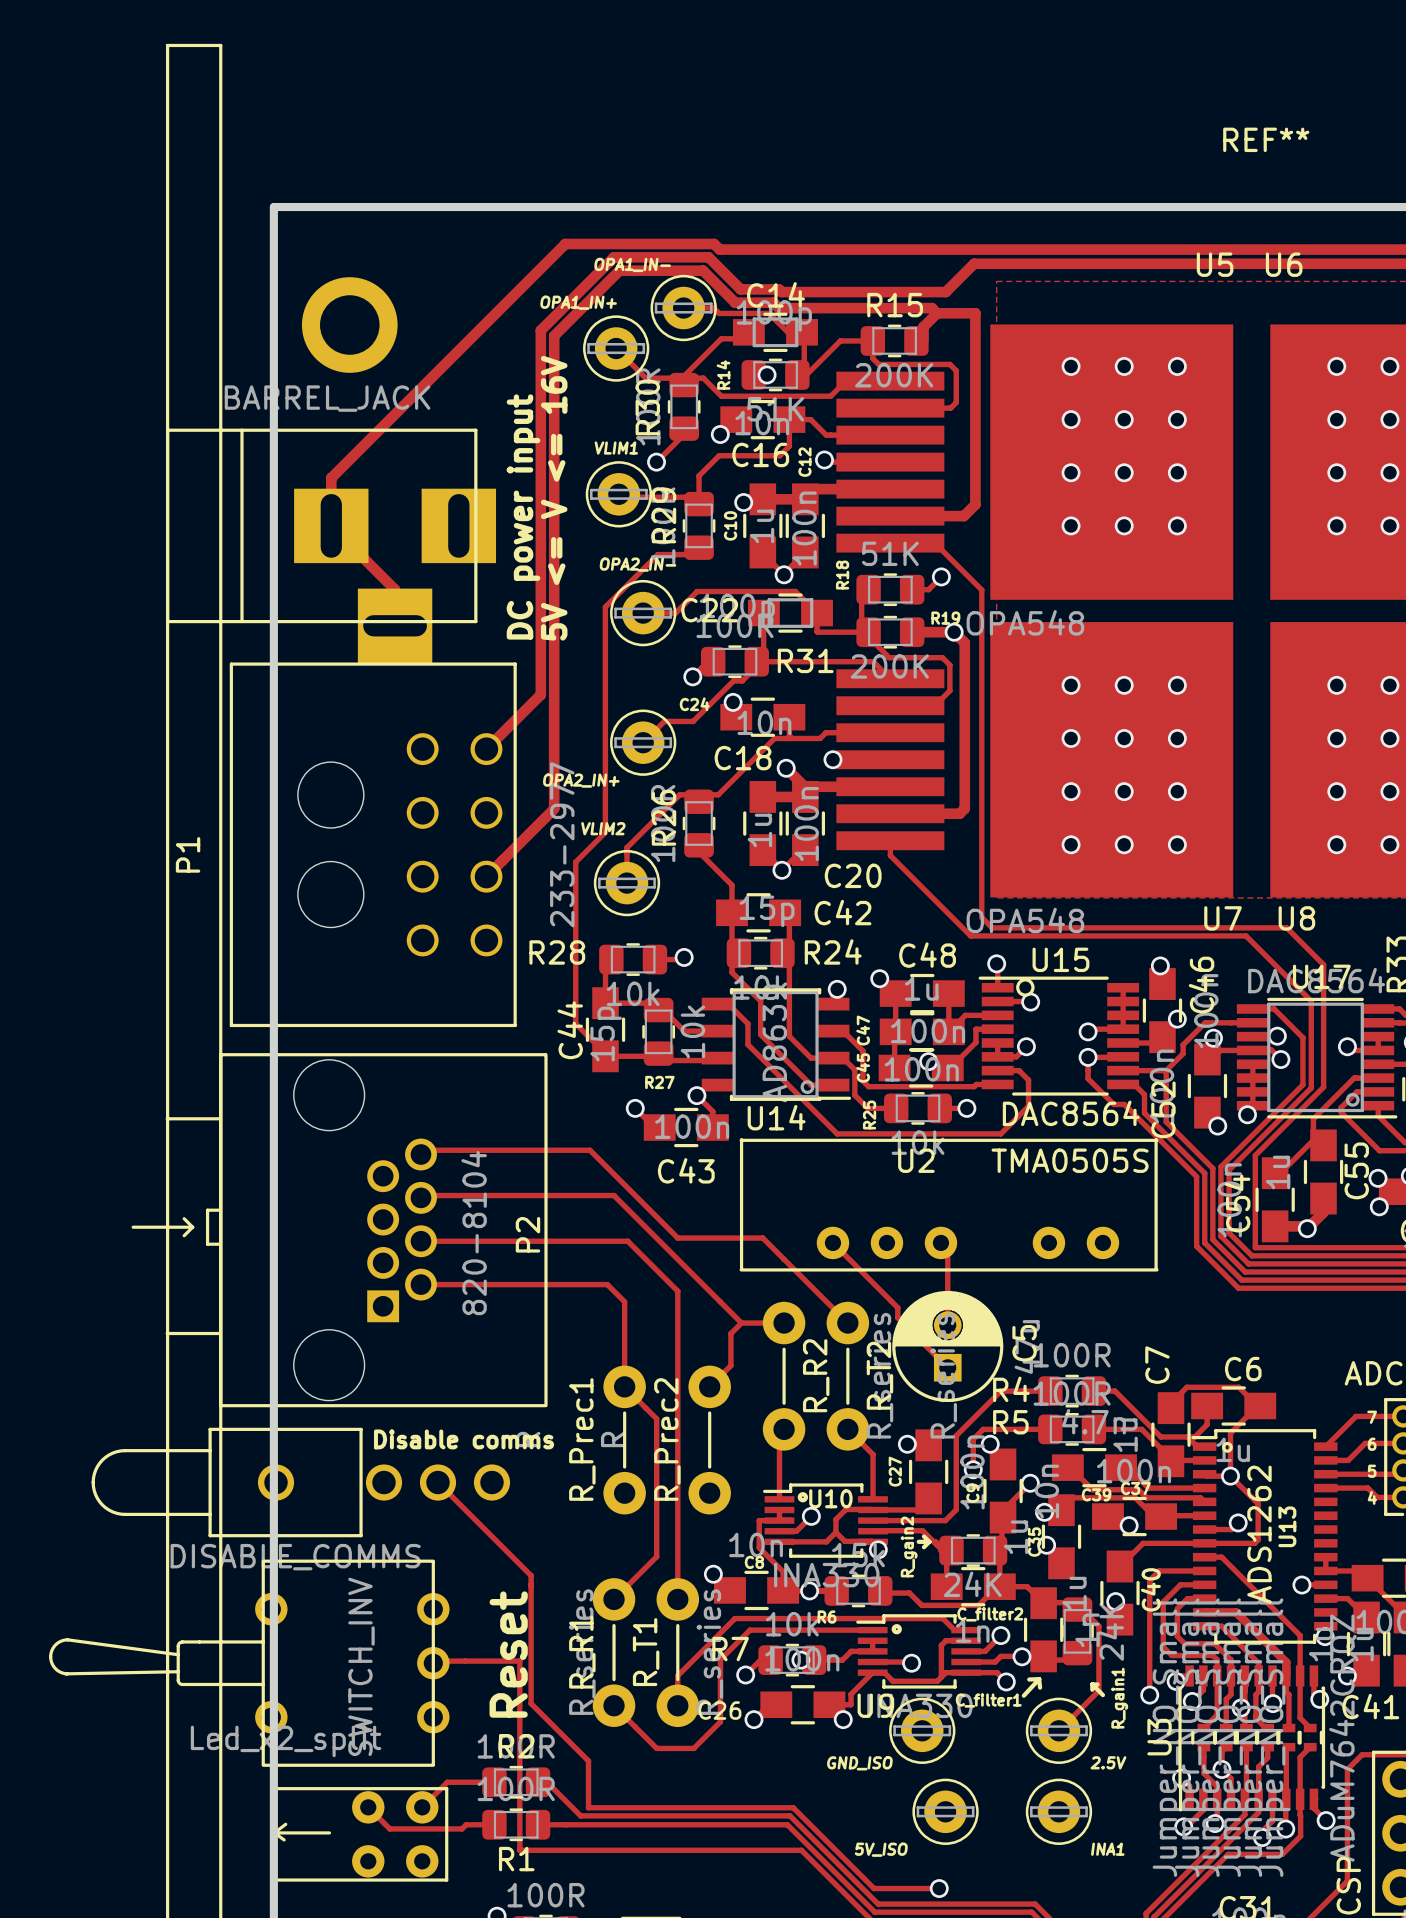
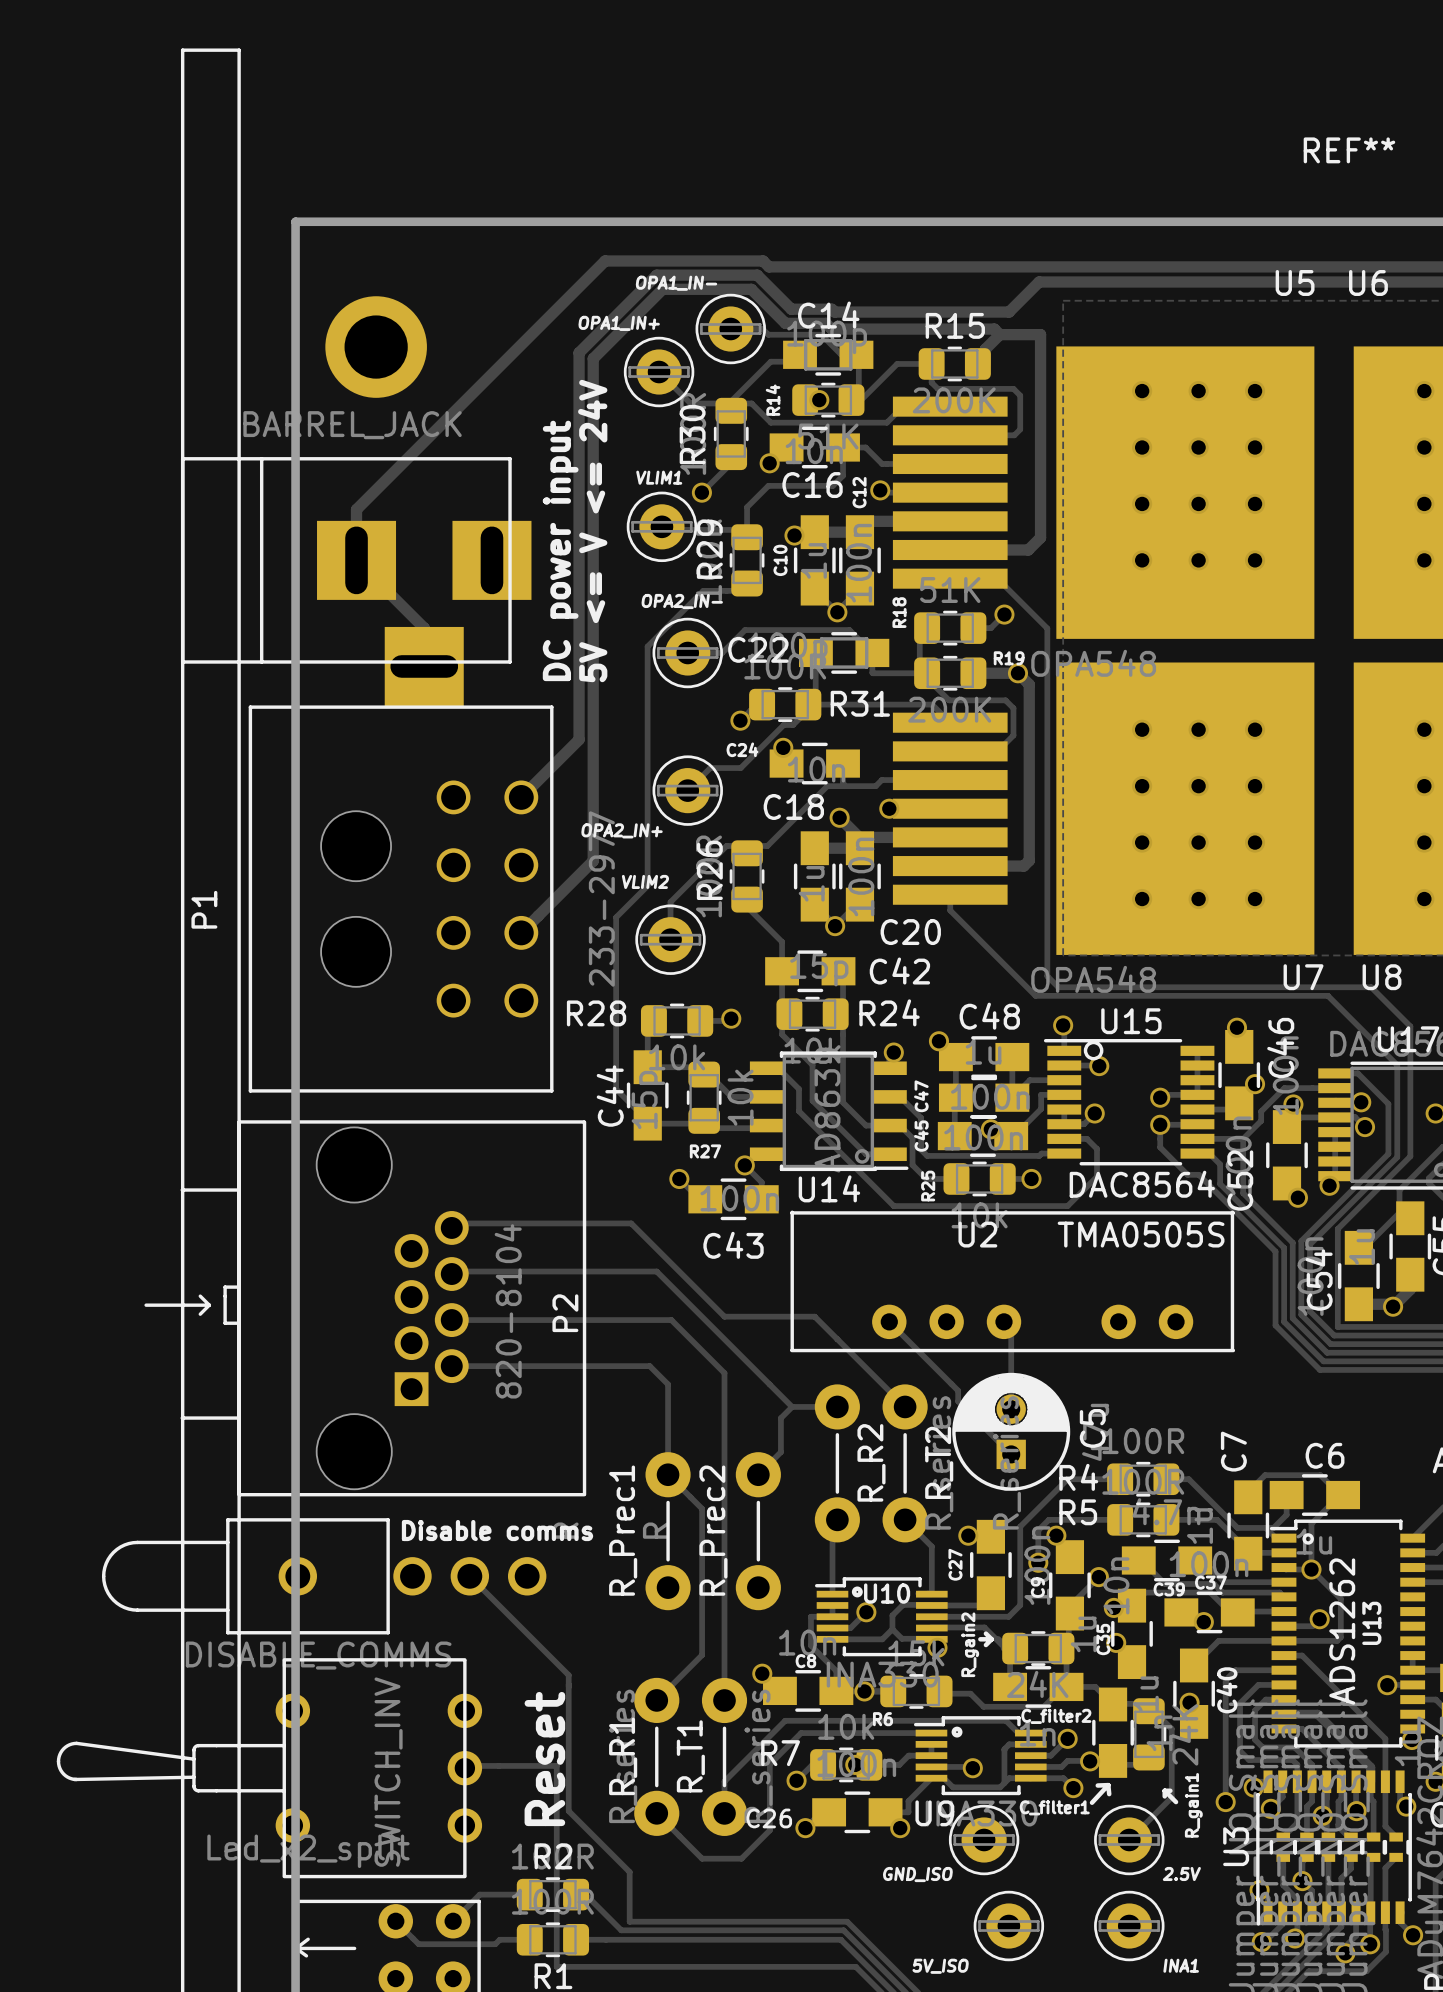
text: 5V <= V <= 16V (554, 498) -> 5V <= V <= 24V (592, 531)

